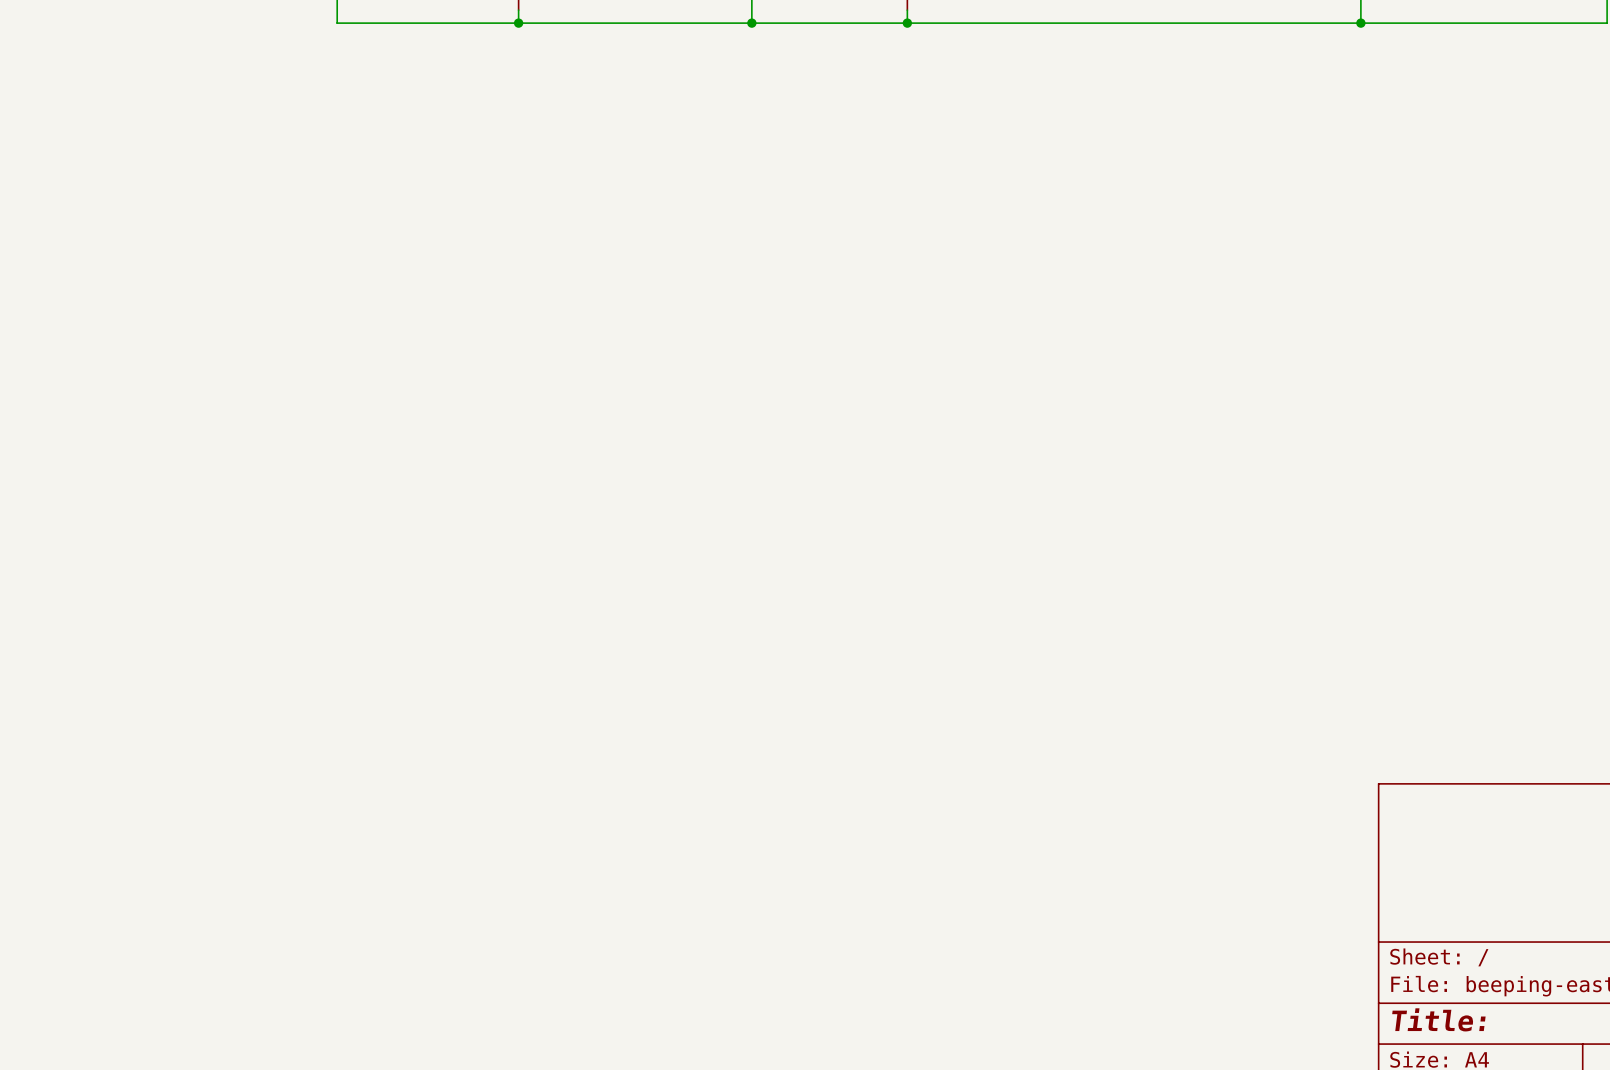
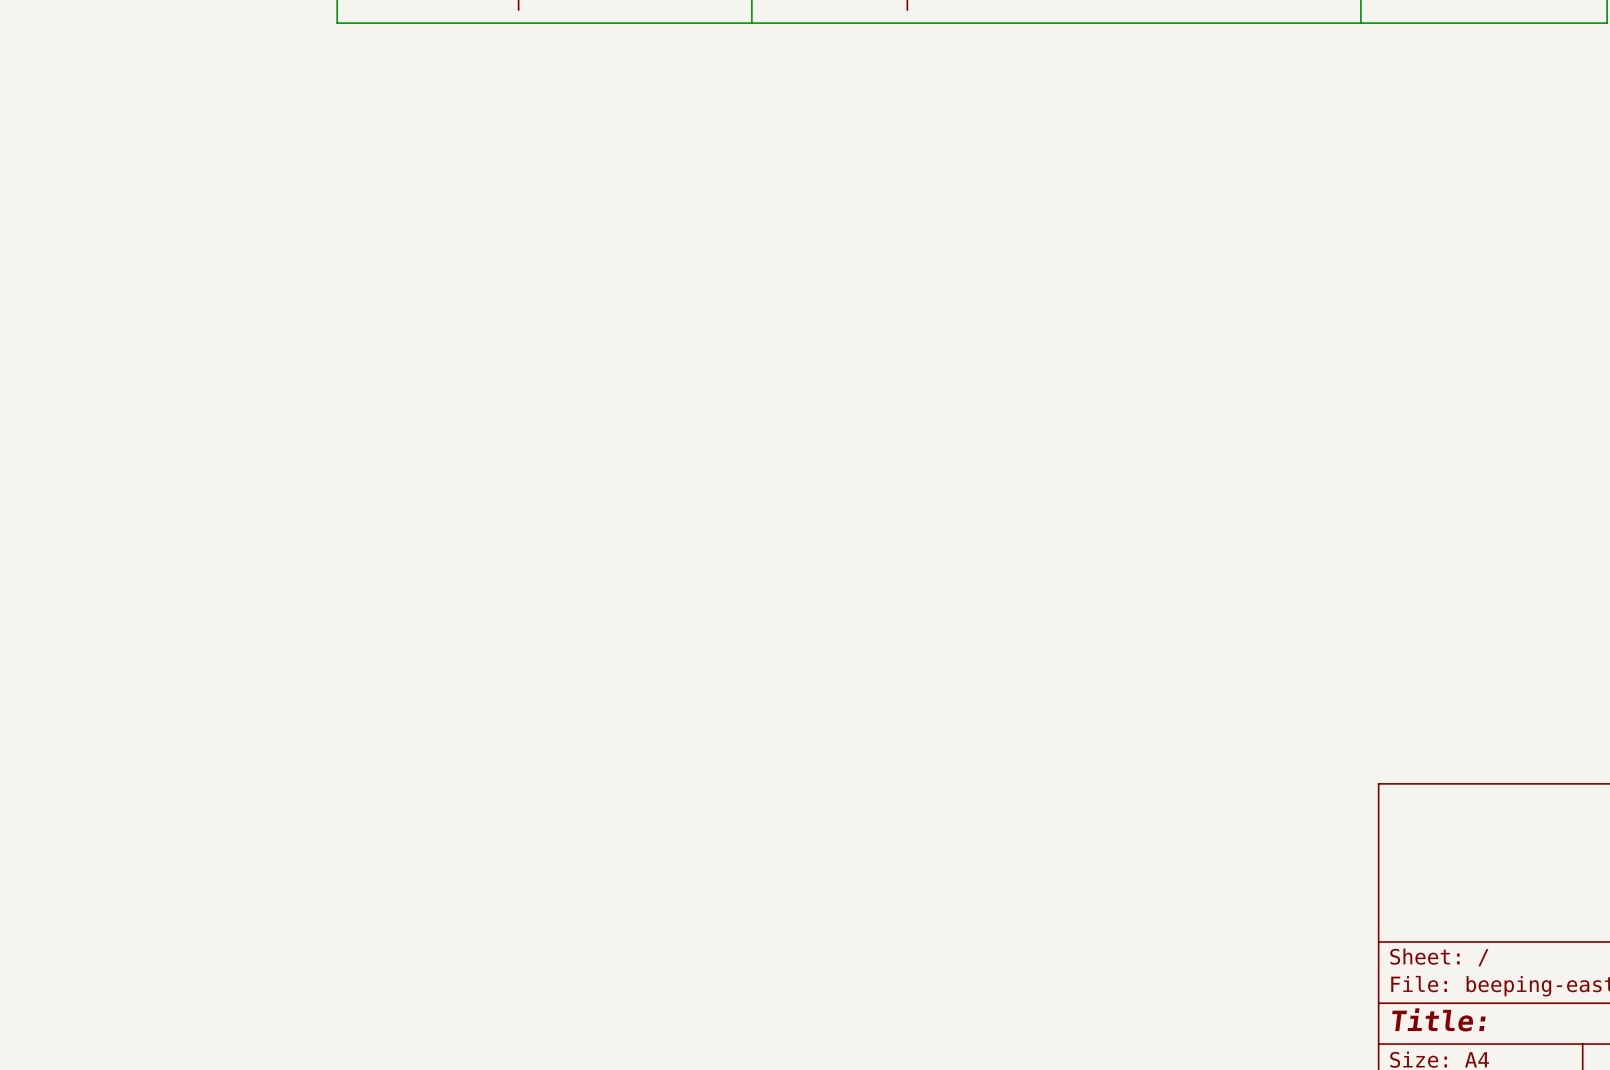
wire: (518, 10) (518, 23) -> none
wire: (907, 10) (907, 23) -> none
junction: (518, 23) -> none
junction: (751, 23) -> none
junction: (907, 23) -> none
junction: (1360, 23) -> none

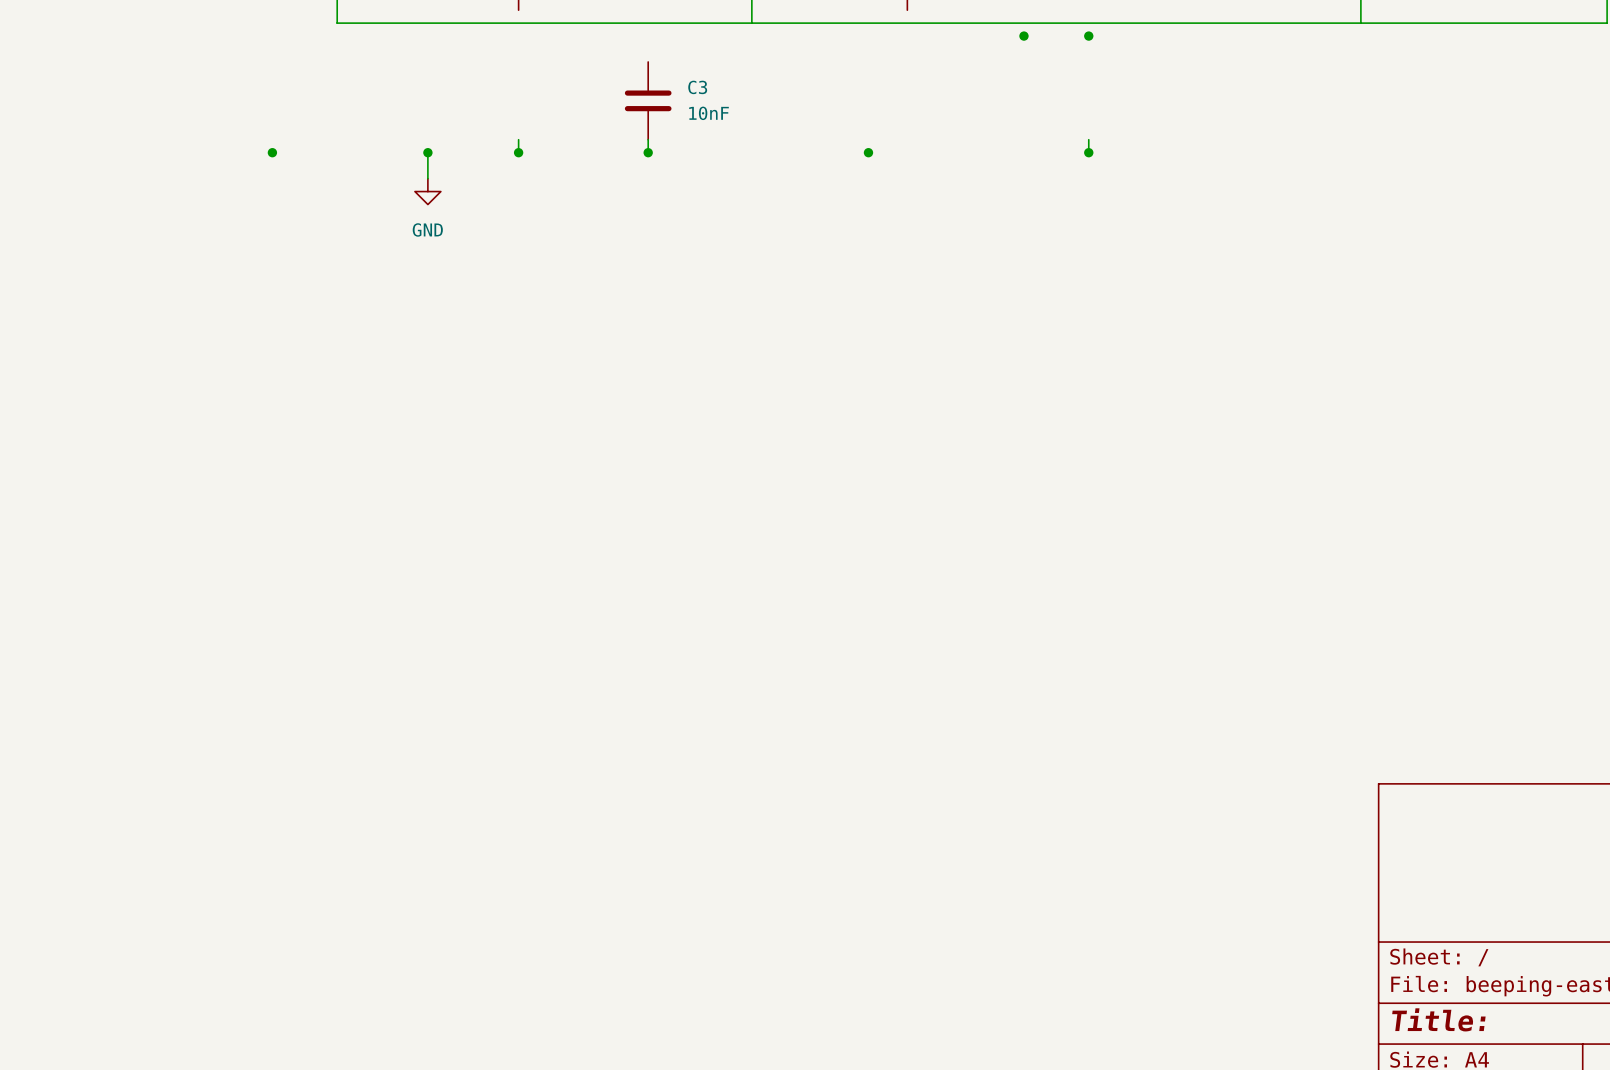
junction: none -> (1023, 36)
junction: none -> (1088, 36)
C3: none -> 10nF (648, 100)
wire: none -> (518, 139) (518, 152)
wire: none -> (648, 139) (648, 152)
wire: none -> (1088, 139) (1088, 152)
junction: none -> (272, 152)
wire: none -> (427, 152) (427, 178)
junction: none -> (427, 152)
junction: none -> (518, 152)
junction: none -> (648, 152)
junction: none -> (868, 152)
junction: none -> (1088, 152)
power symbol: none -> GND (427, 191)

